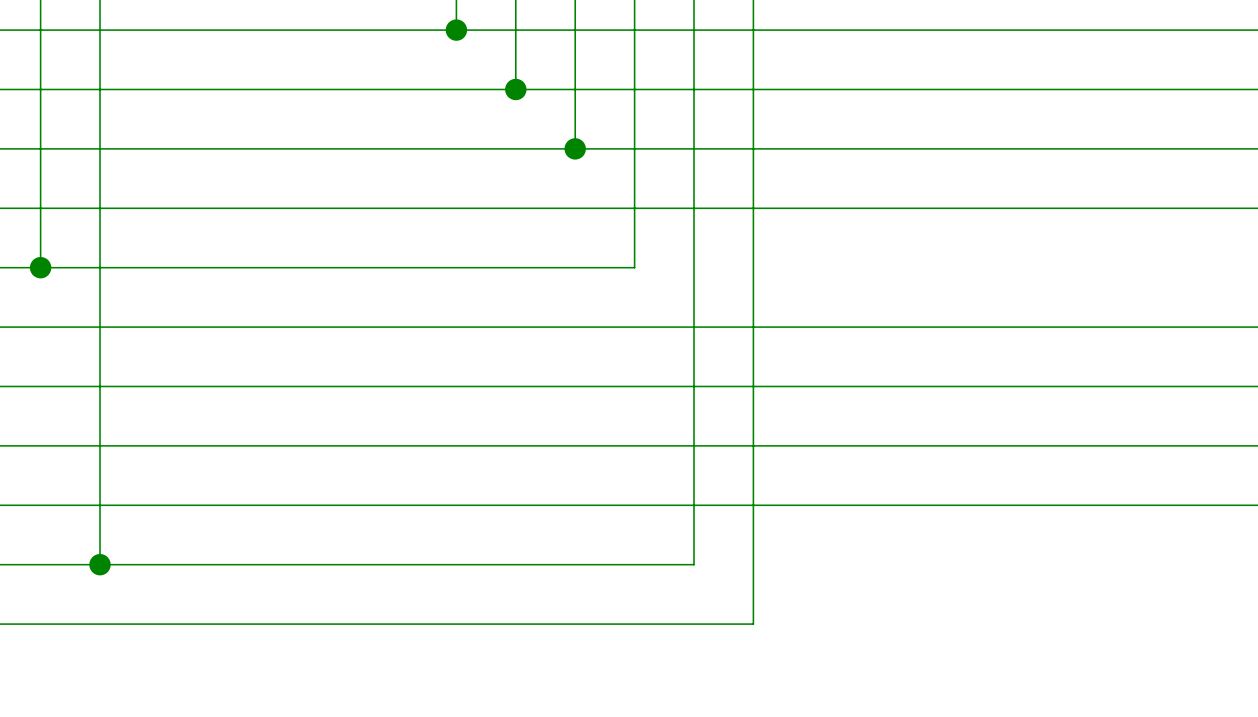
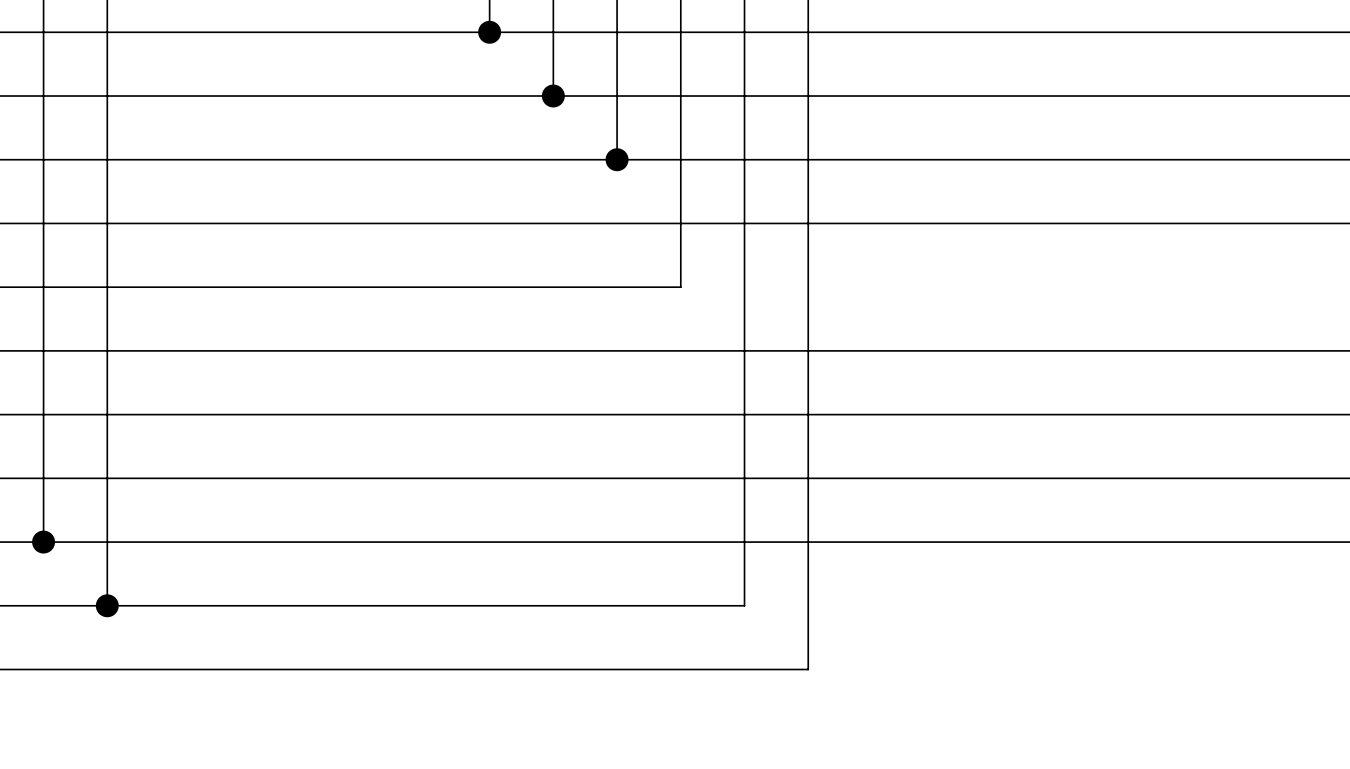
wire: none -> (43, 287) (43, 542)
junction: (40, 267) -> none
junction: none -> (43, 542)

